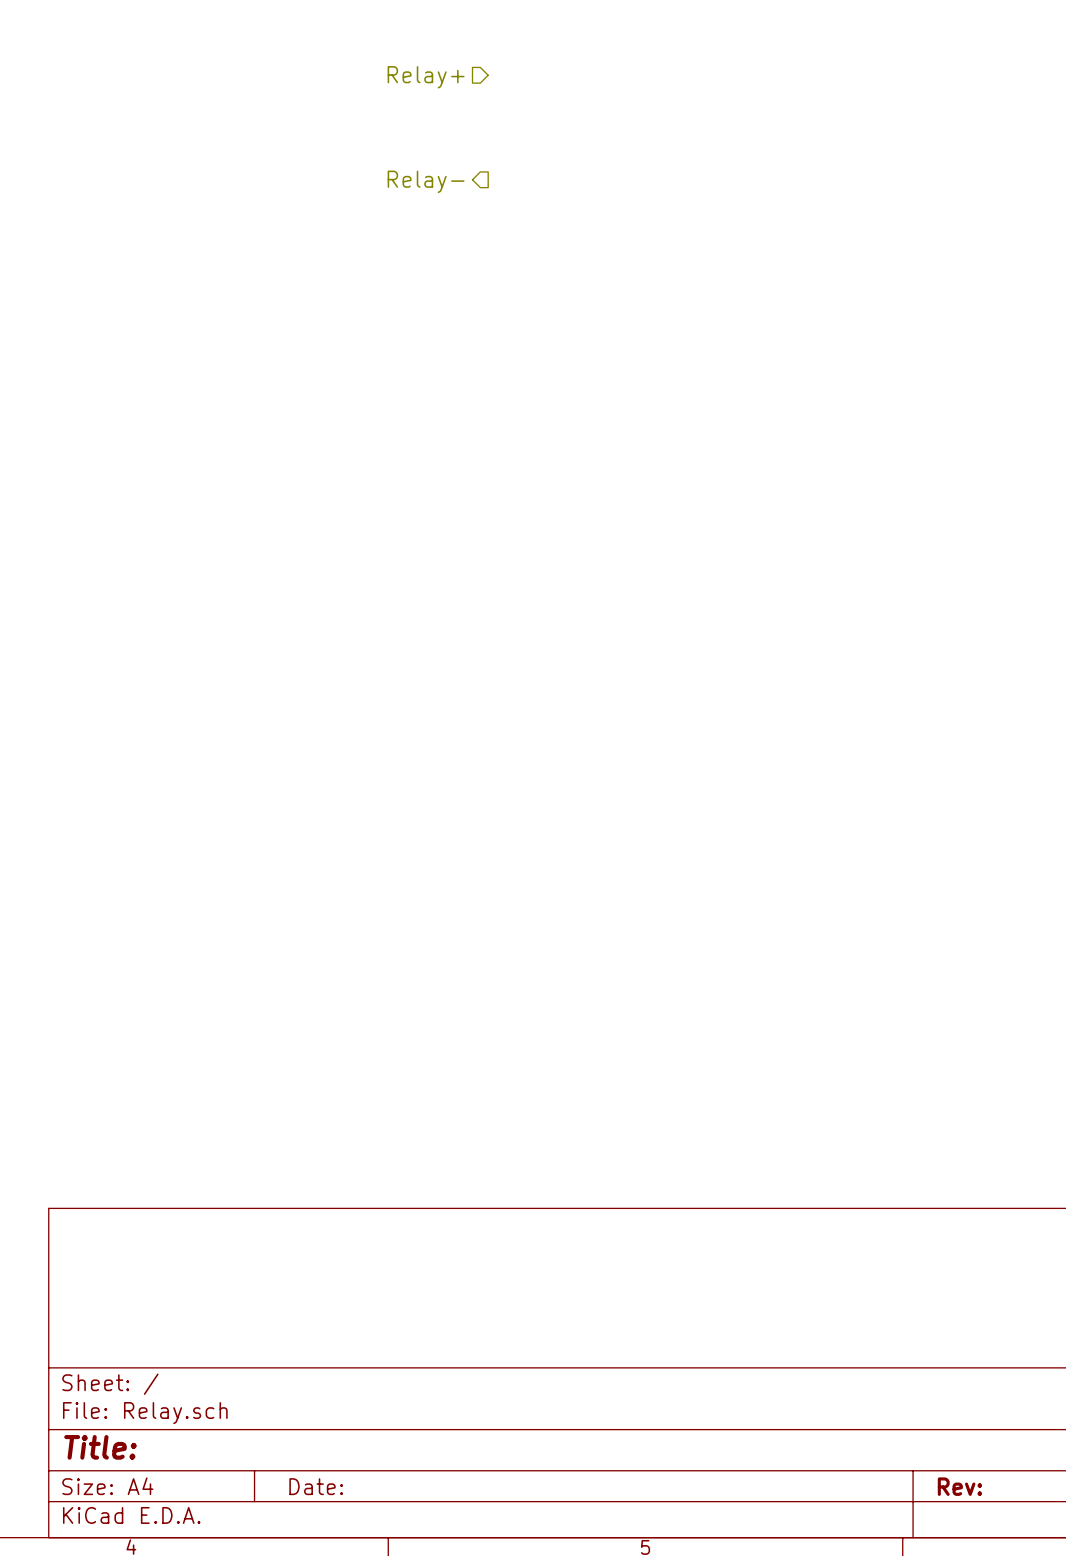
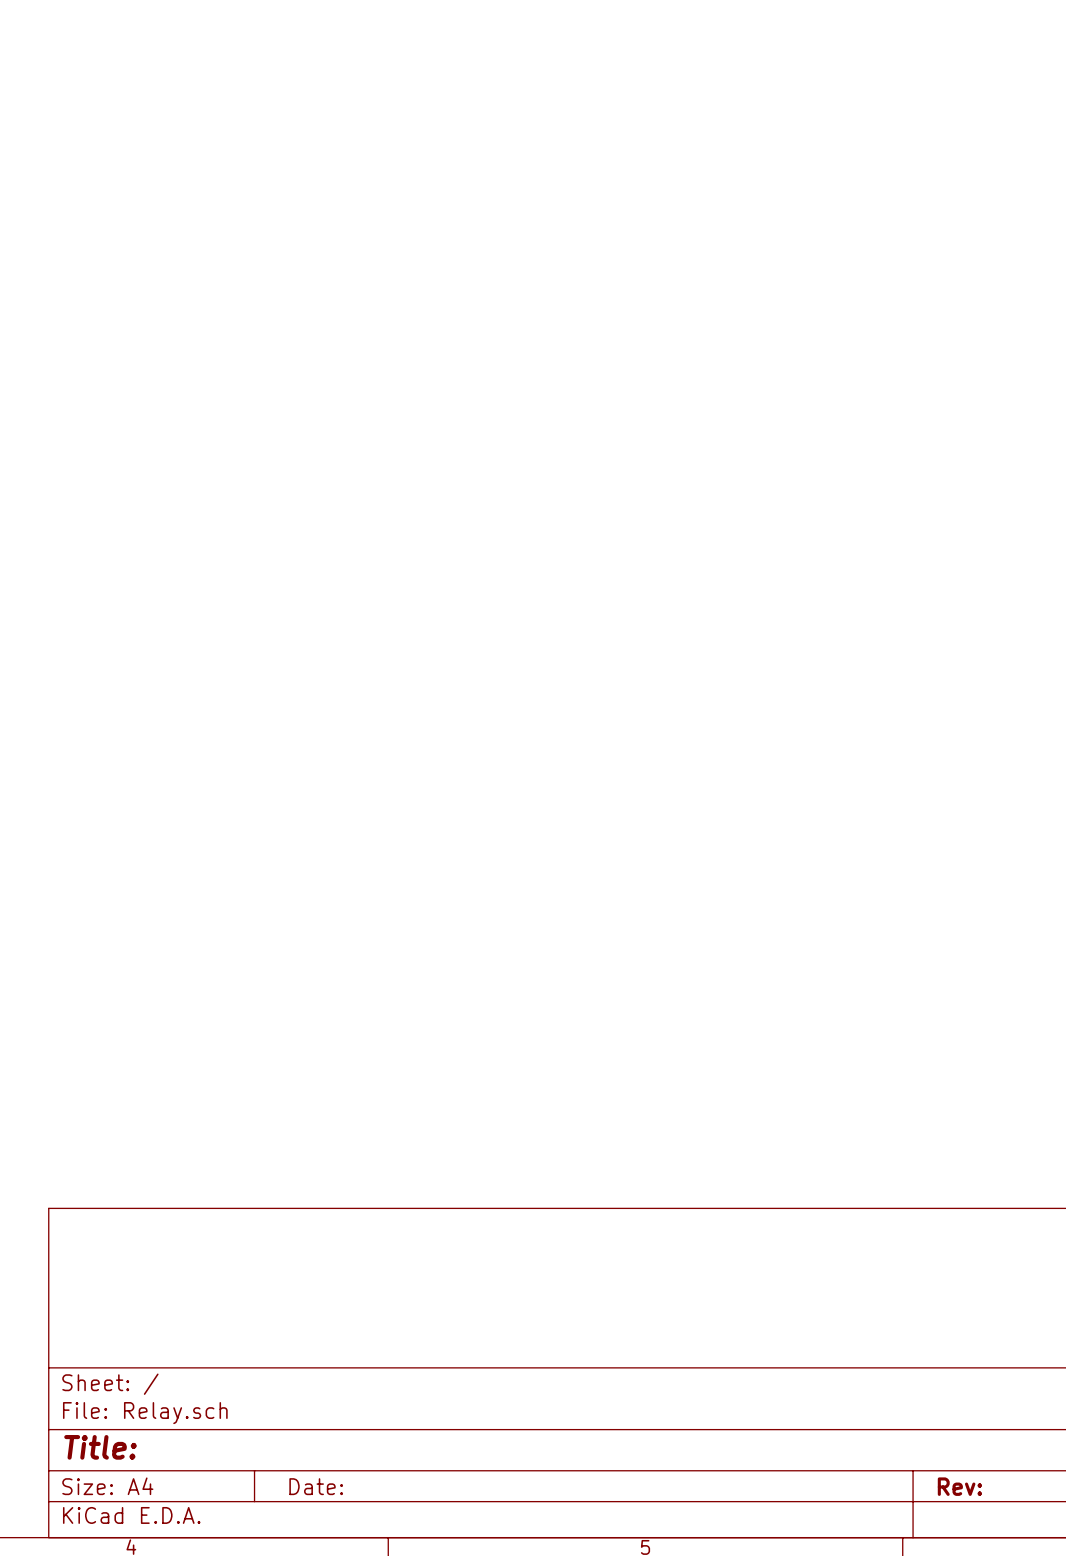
hierarchical label: Relay+ (426, 77) -> none
hierarchical label: Relay- (426, 181) -> none

